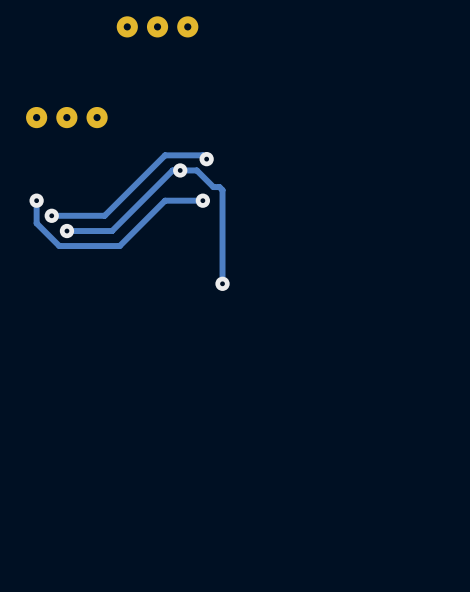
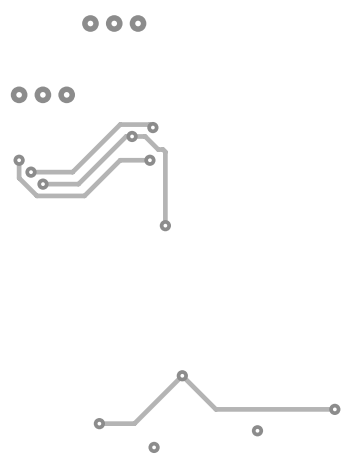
via: none -> (182, 375)
track: none -> (334, 409) (215, 409) (182, 375) (134, 423) (99, 423)
via: none -> (334, 409)
via: none -> (99, 423)
via: none -> (257, 430)
via: none -> (154, 447)

